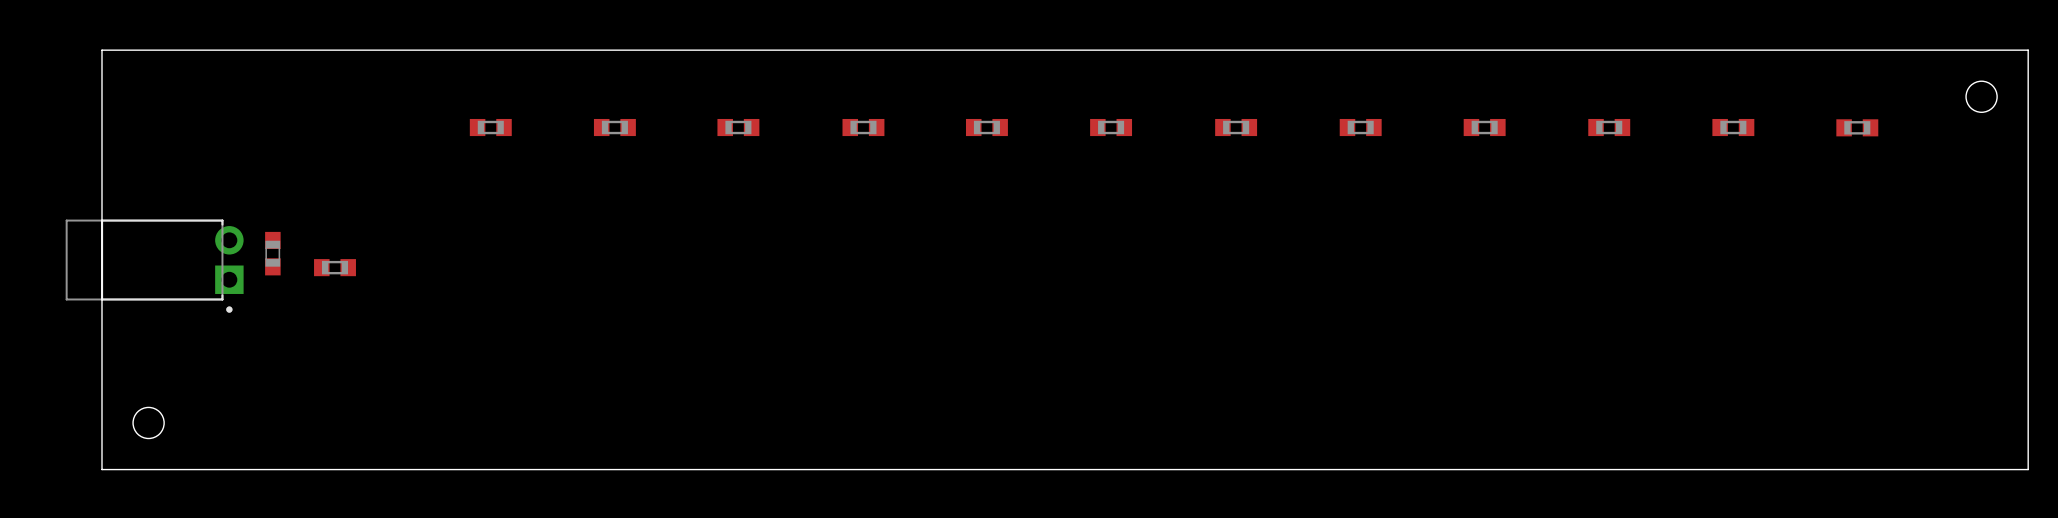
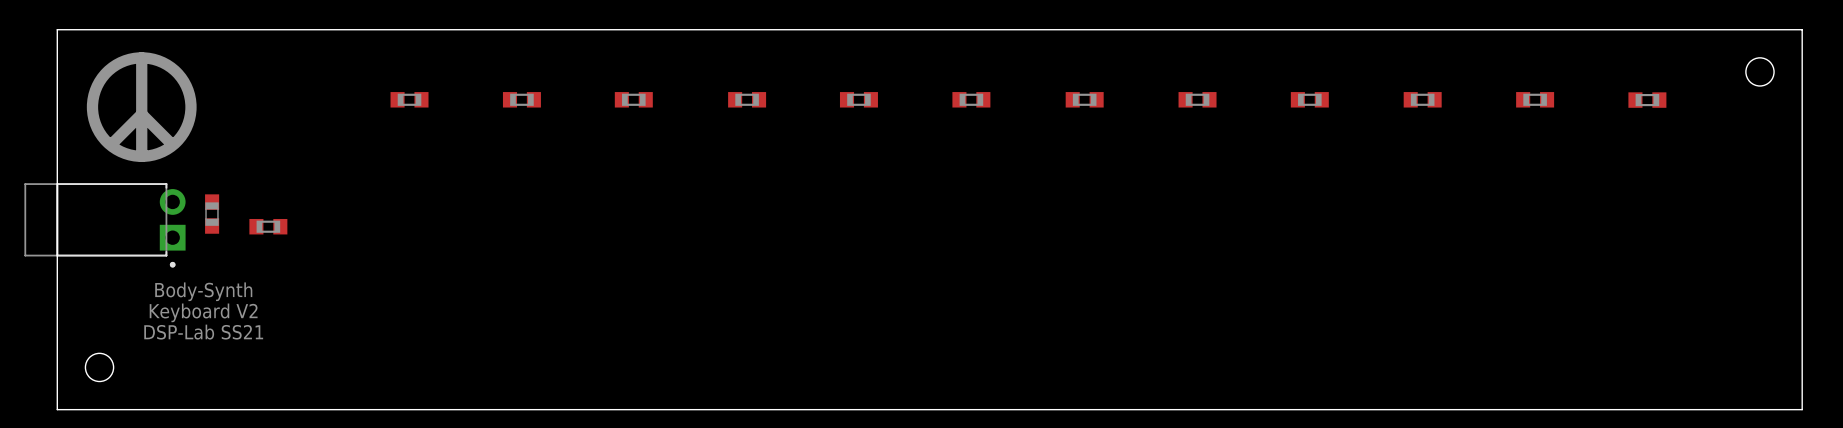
drawing: none -> [86, 52, 197, 162]
line: none -> (141, 57) (141, 156)
line: none -> (113, 142) (141, 114) (169, 142)
text: none -> Body-Synth (203, 291)
text: none -> Keyboard V2 (203, 312)
text: none -> DSP-Lab SS21 (203, 332)

